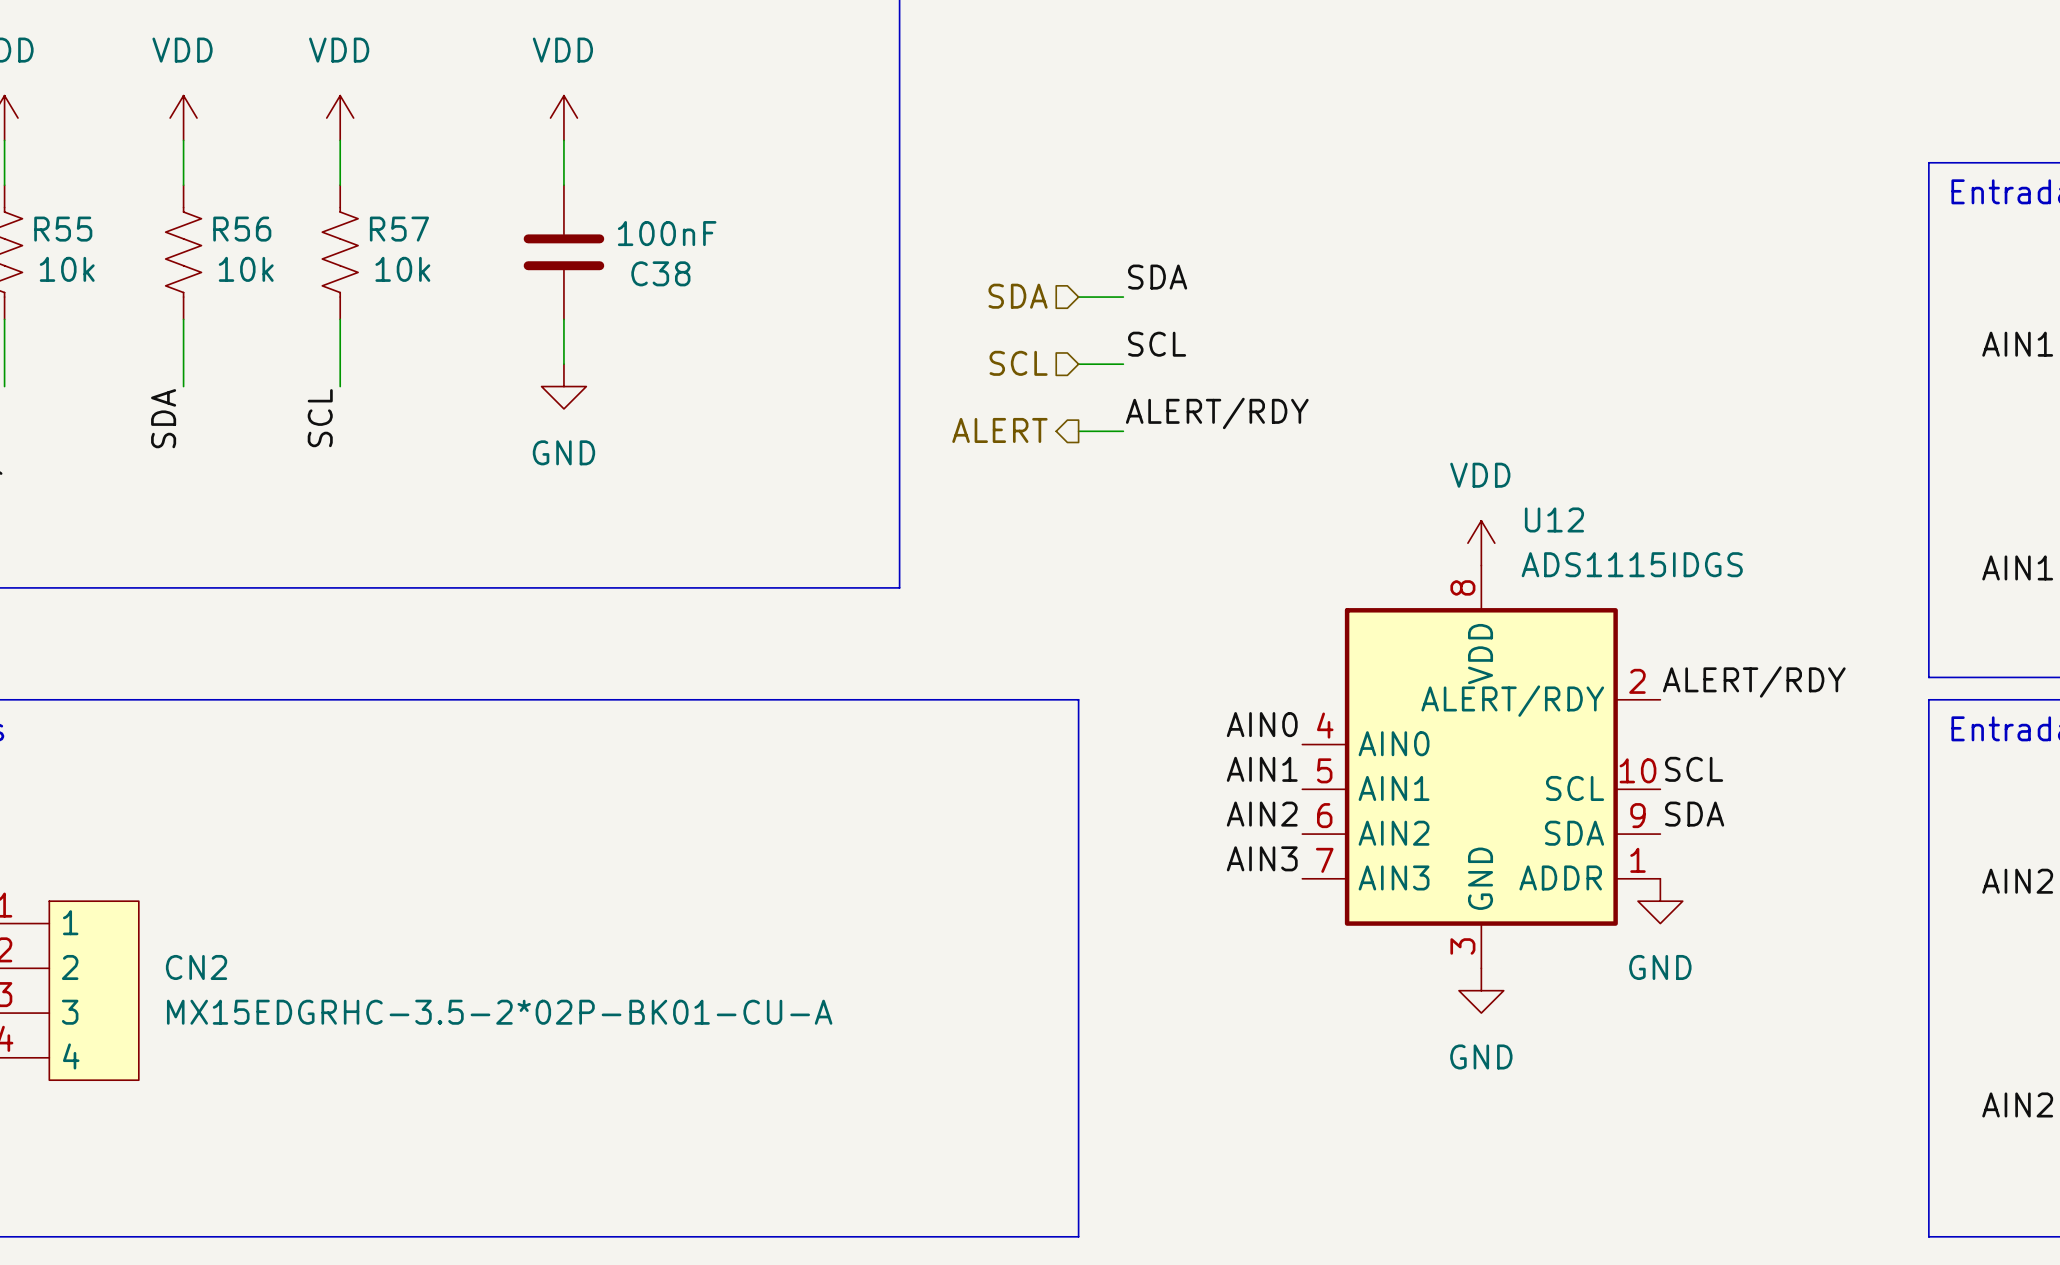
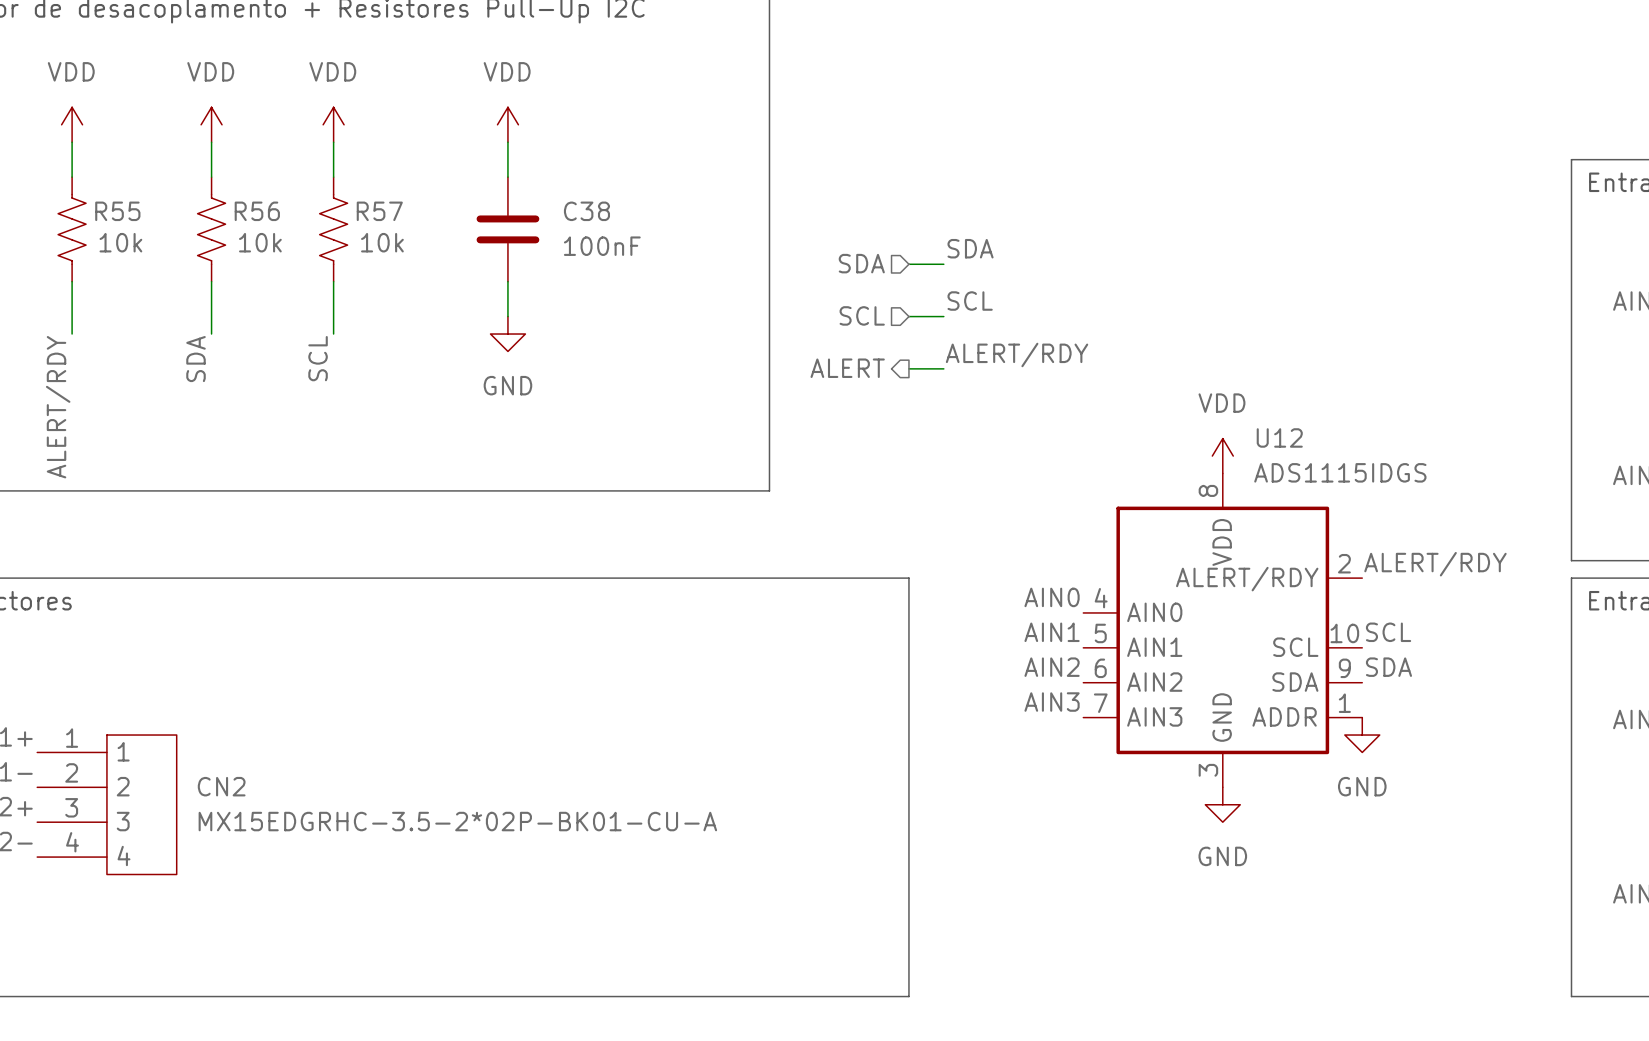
C38 value position: 100nF (667, 233) -> 100nF (602, 246)
C38 name position: C38 (660, 273) -> C38 (586, 211)

